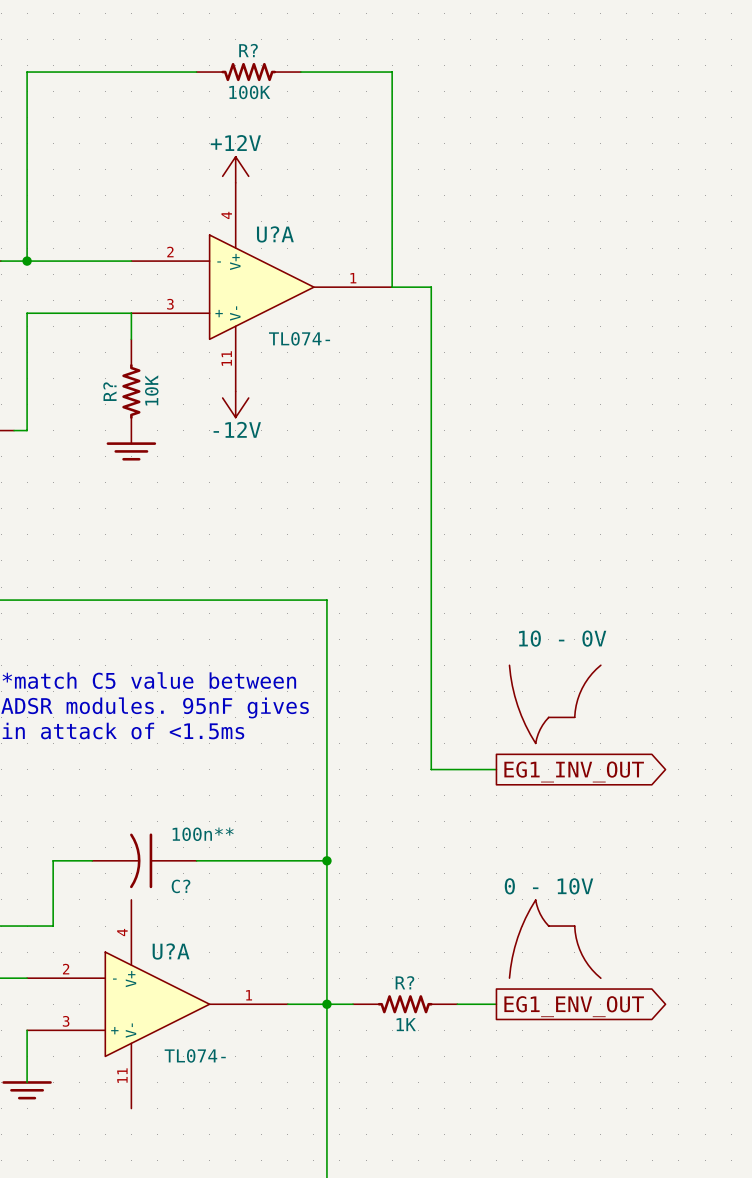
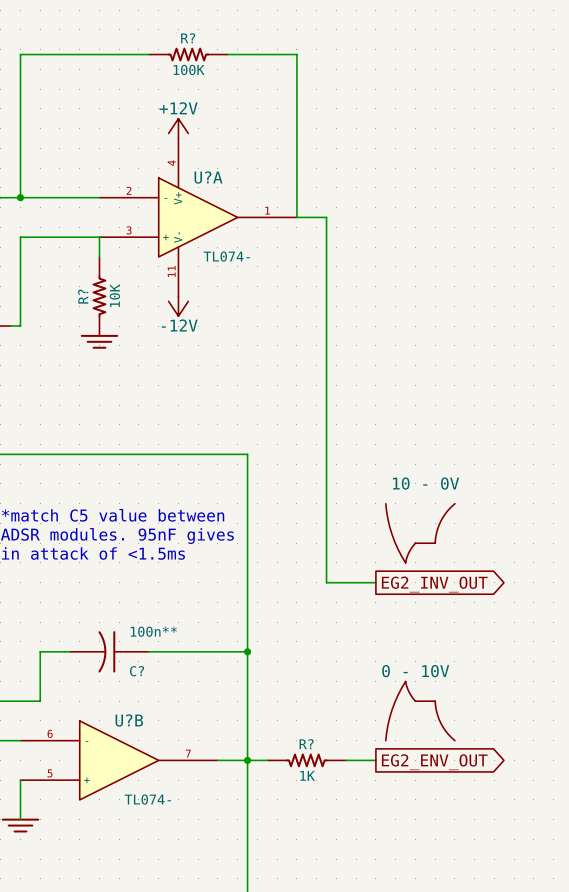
global label: EG1_INV_OUT (574, 771) -> EG2_INV_OUT (434, 584)
U?A: TL074- (157, 1004) -> none
U?B: none -> TL074- (119, 760)
global label: EG1_ENV_OUT (574, 1006) -> EG2_ENV_OUT (434, 762)

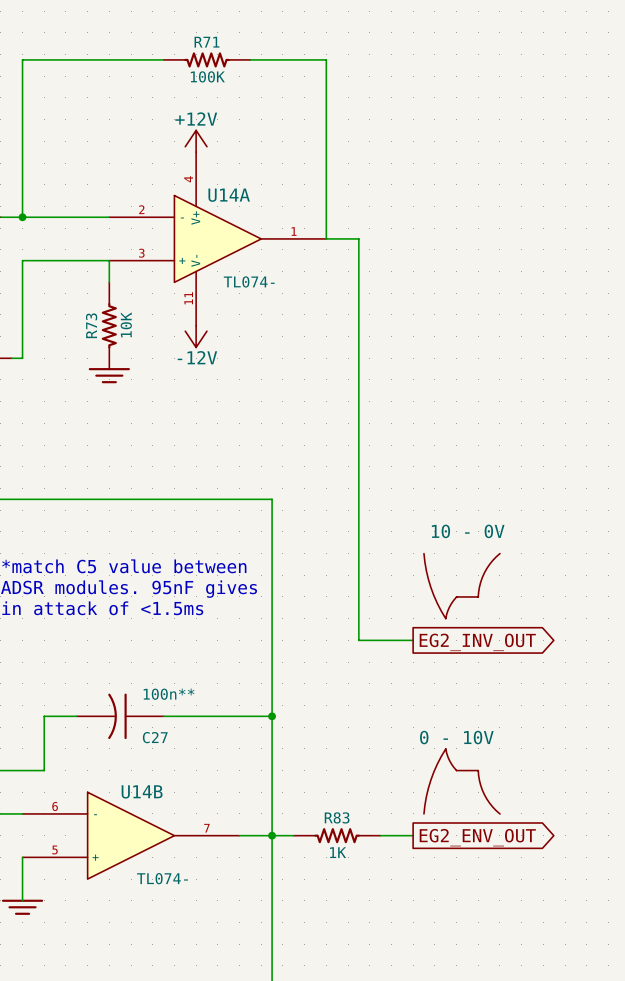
R? name: R? (188, 38) -> R71 (206, 42)
U?A name: U?A (208, 177) -> U14A (229, 195)
R? name: R? (83, 296) -> R73 (91, 325)
C? name: C? (137, 671) -> C27 (155, 737)
U?B name: U?B (129, 720) -> U14B (142, 791)
R? name: R? (306, 744) -> R83 (337, 817)

